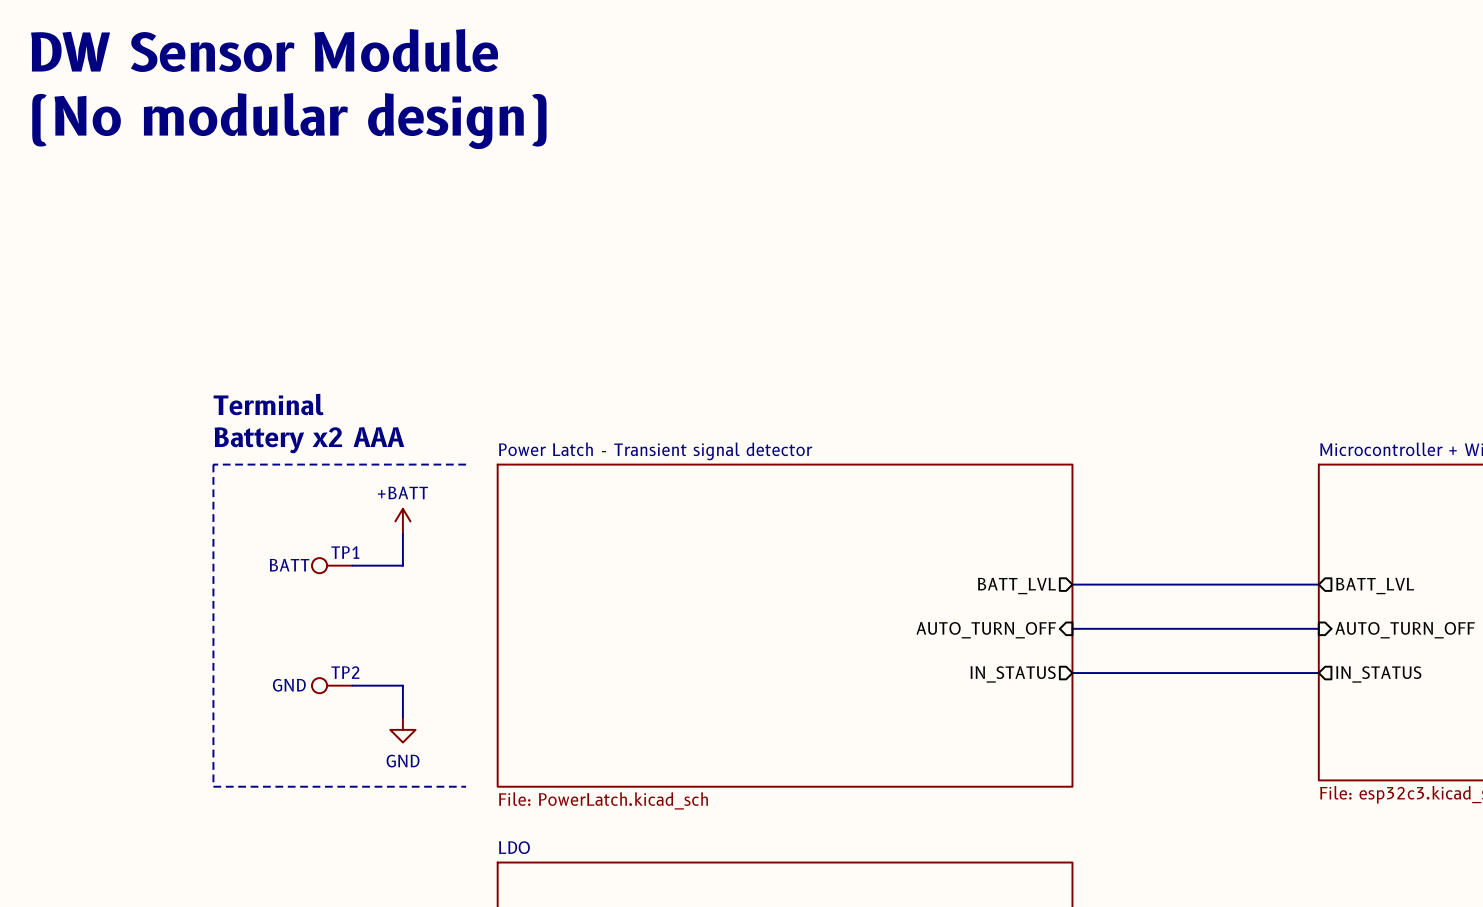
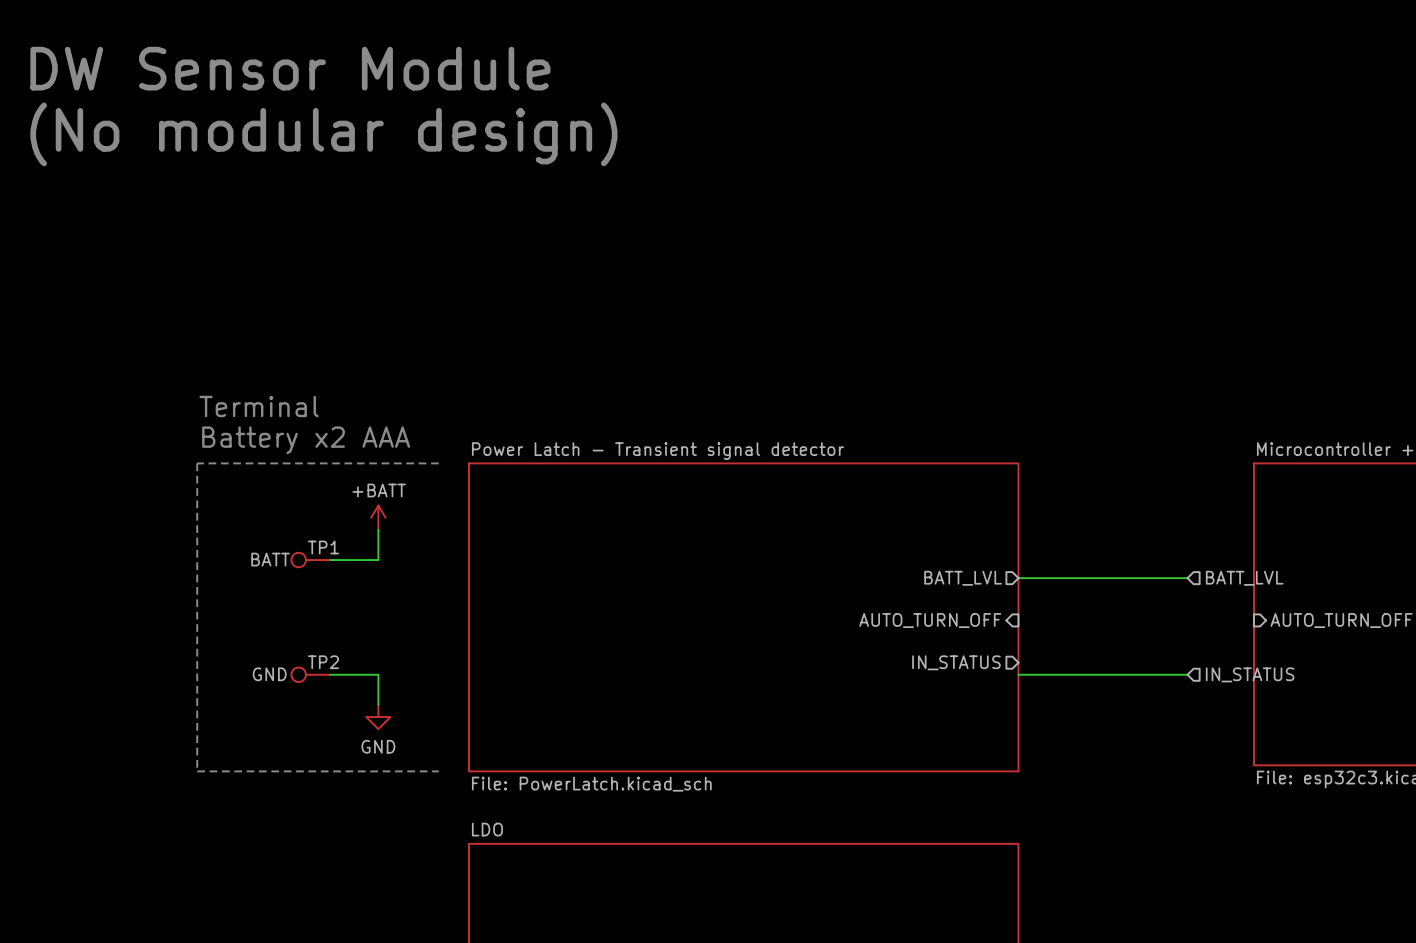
wire: (1249, 584) (1318, 584) -> none
sheet pin position: BATT_LVL (1375, 586) -> BATT_LVL (1244, 578)
wire: (1072, 628) (1318, 628) -> none
wire: (1072, 673) (1318, 673) -> none
sheet pin position: IN_STATUS (1378, 674) -> IN_STATUS (1250, 674)
wire: none -> (1018, 674) (1187, 674)

